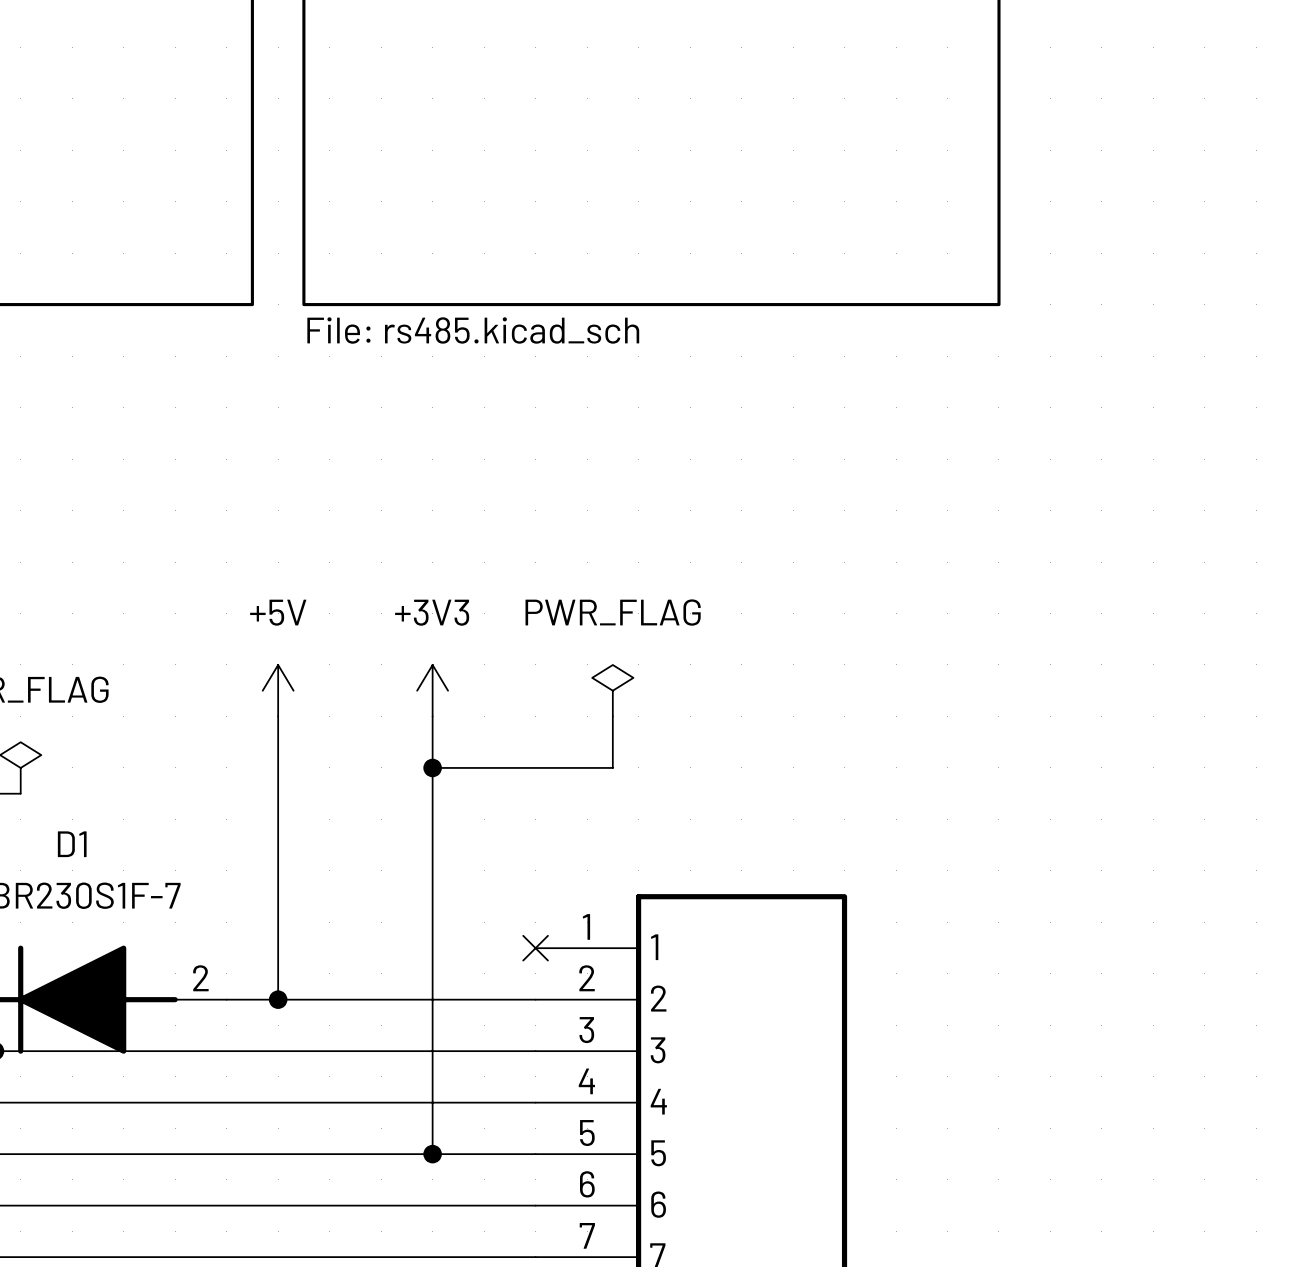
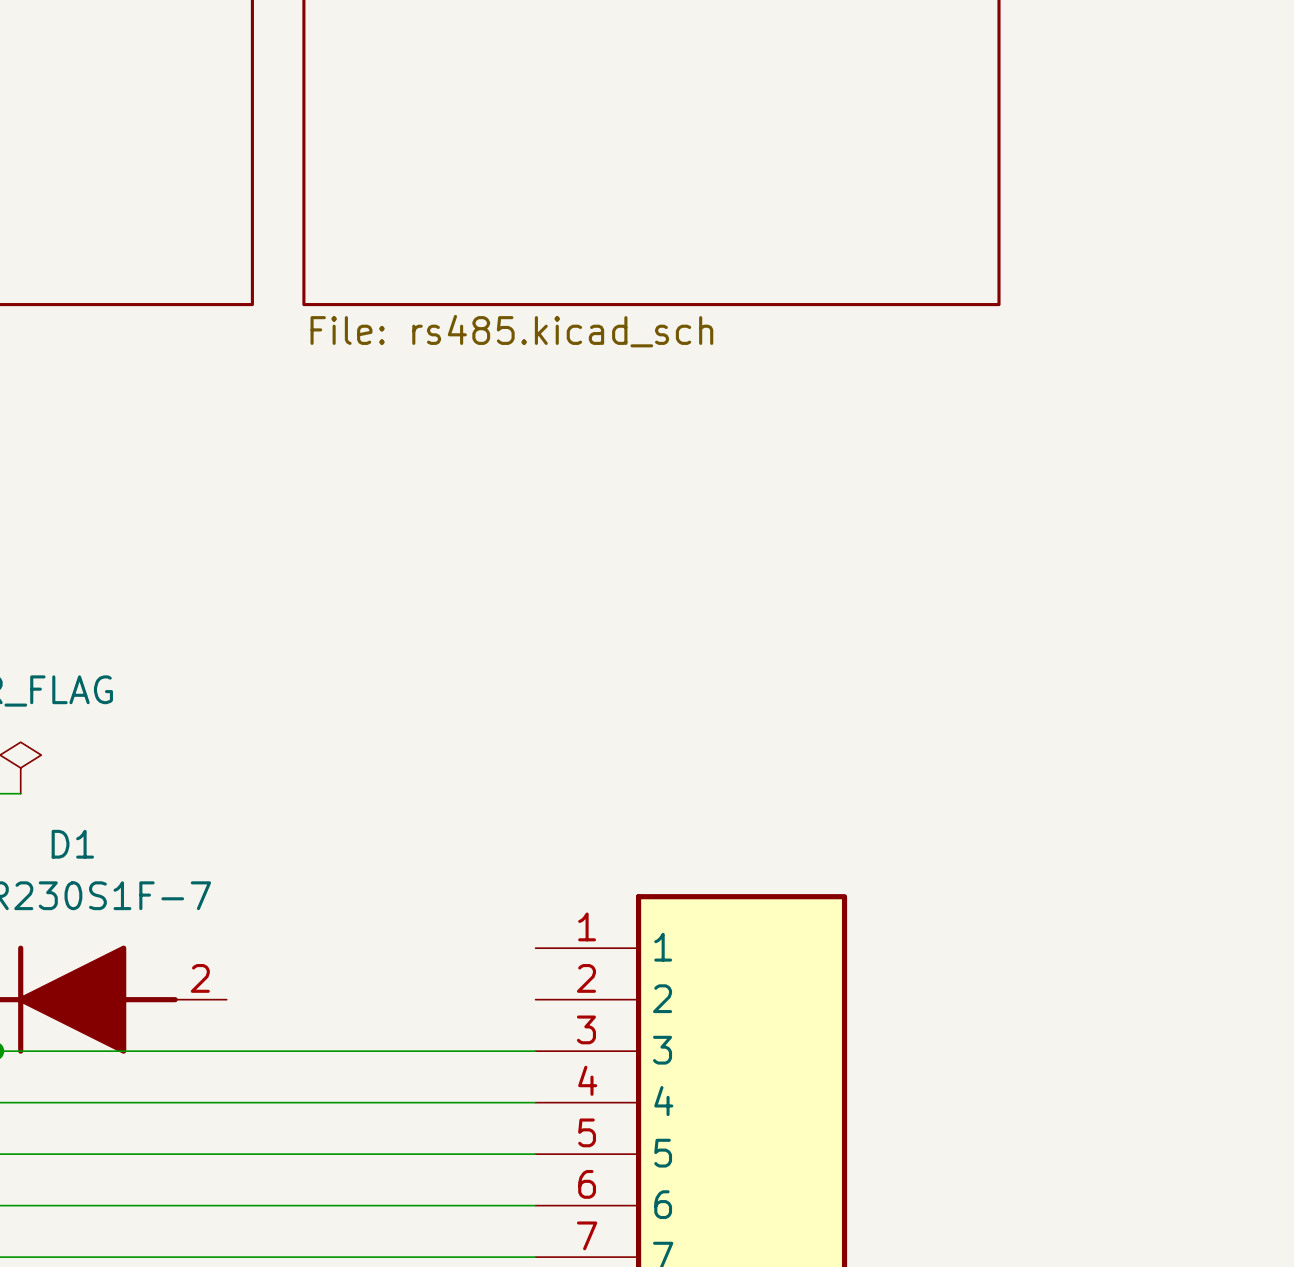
power symbol: +5V (278, 690) -> none
power symbol: +3V3 (432, 690) -> none
power symbol: PWR_FLAG (612, 690) -> none
wire: (278, 716) (278, 999) -> none
wire: (432, 716) (432, 1154) -> none
wire: (612, 716) (612, 767) (432, 767) -> none
junction: (432, 767) -> none
no-connect mark: (535, 948) -> none
wire: (226, 999) (535, 999) -> none
junction: (278, 999) -> none
junction: (432, 1154) -> none

